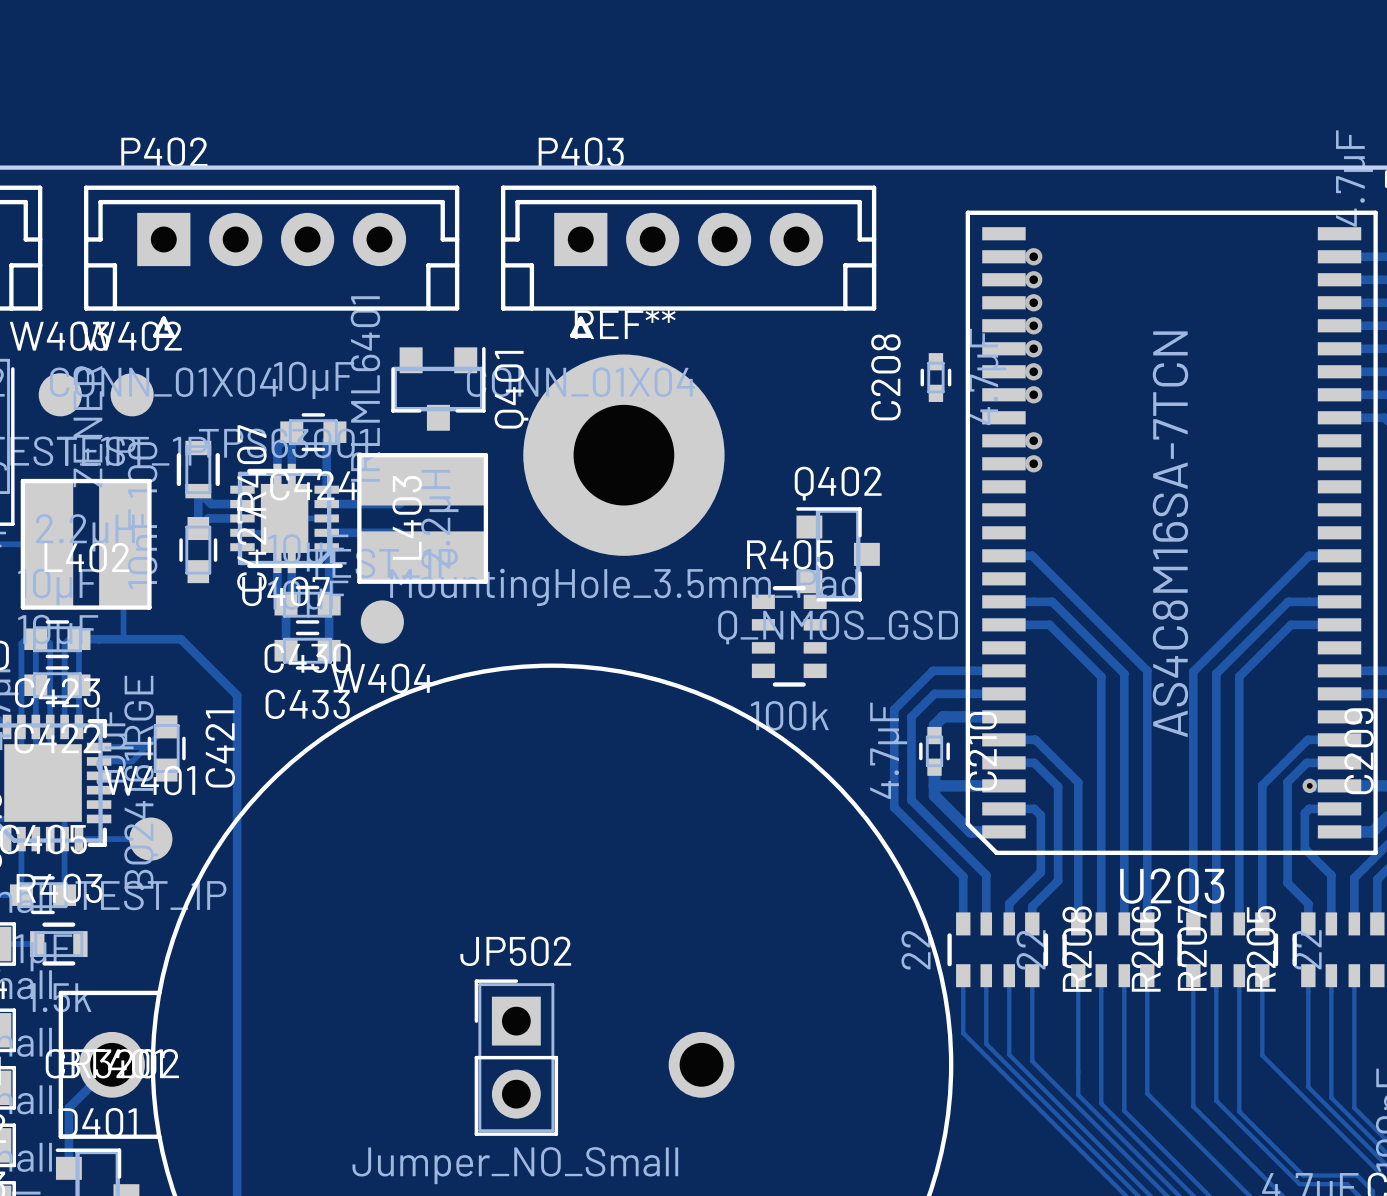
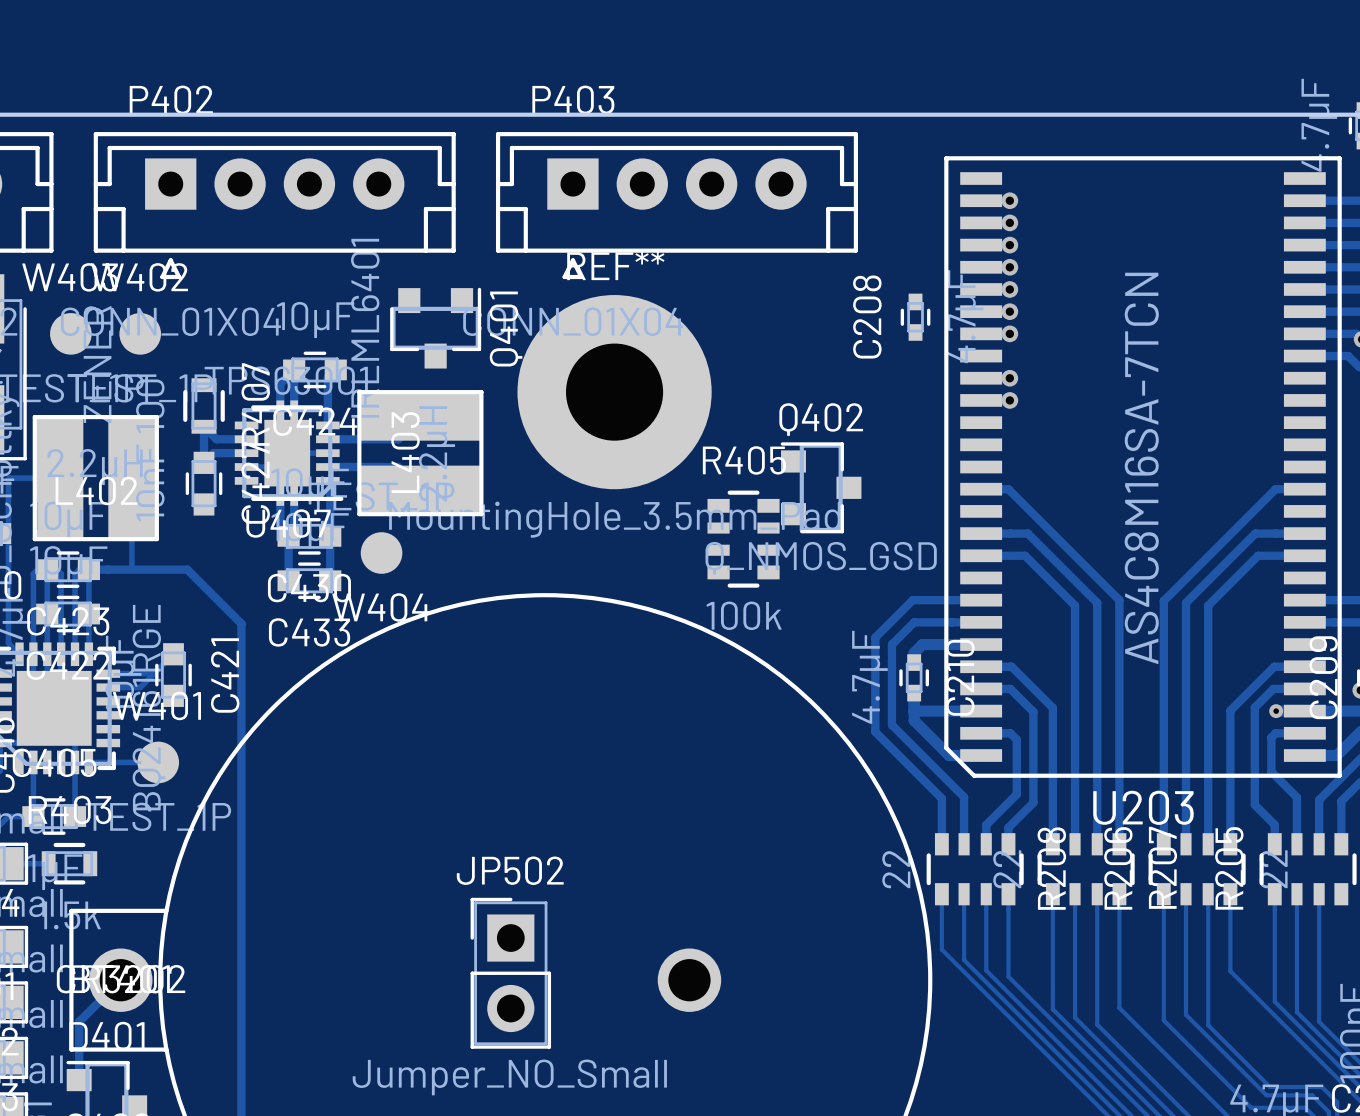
R405 position: (789, 636) -> (743, 539)

